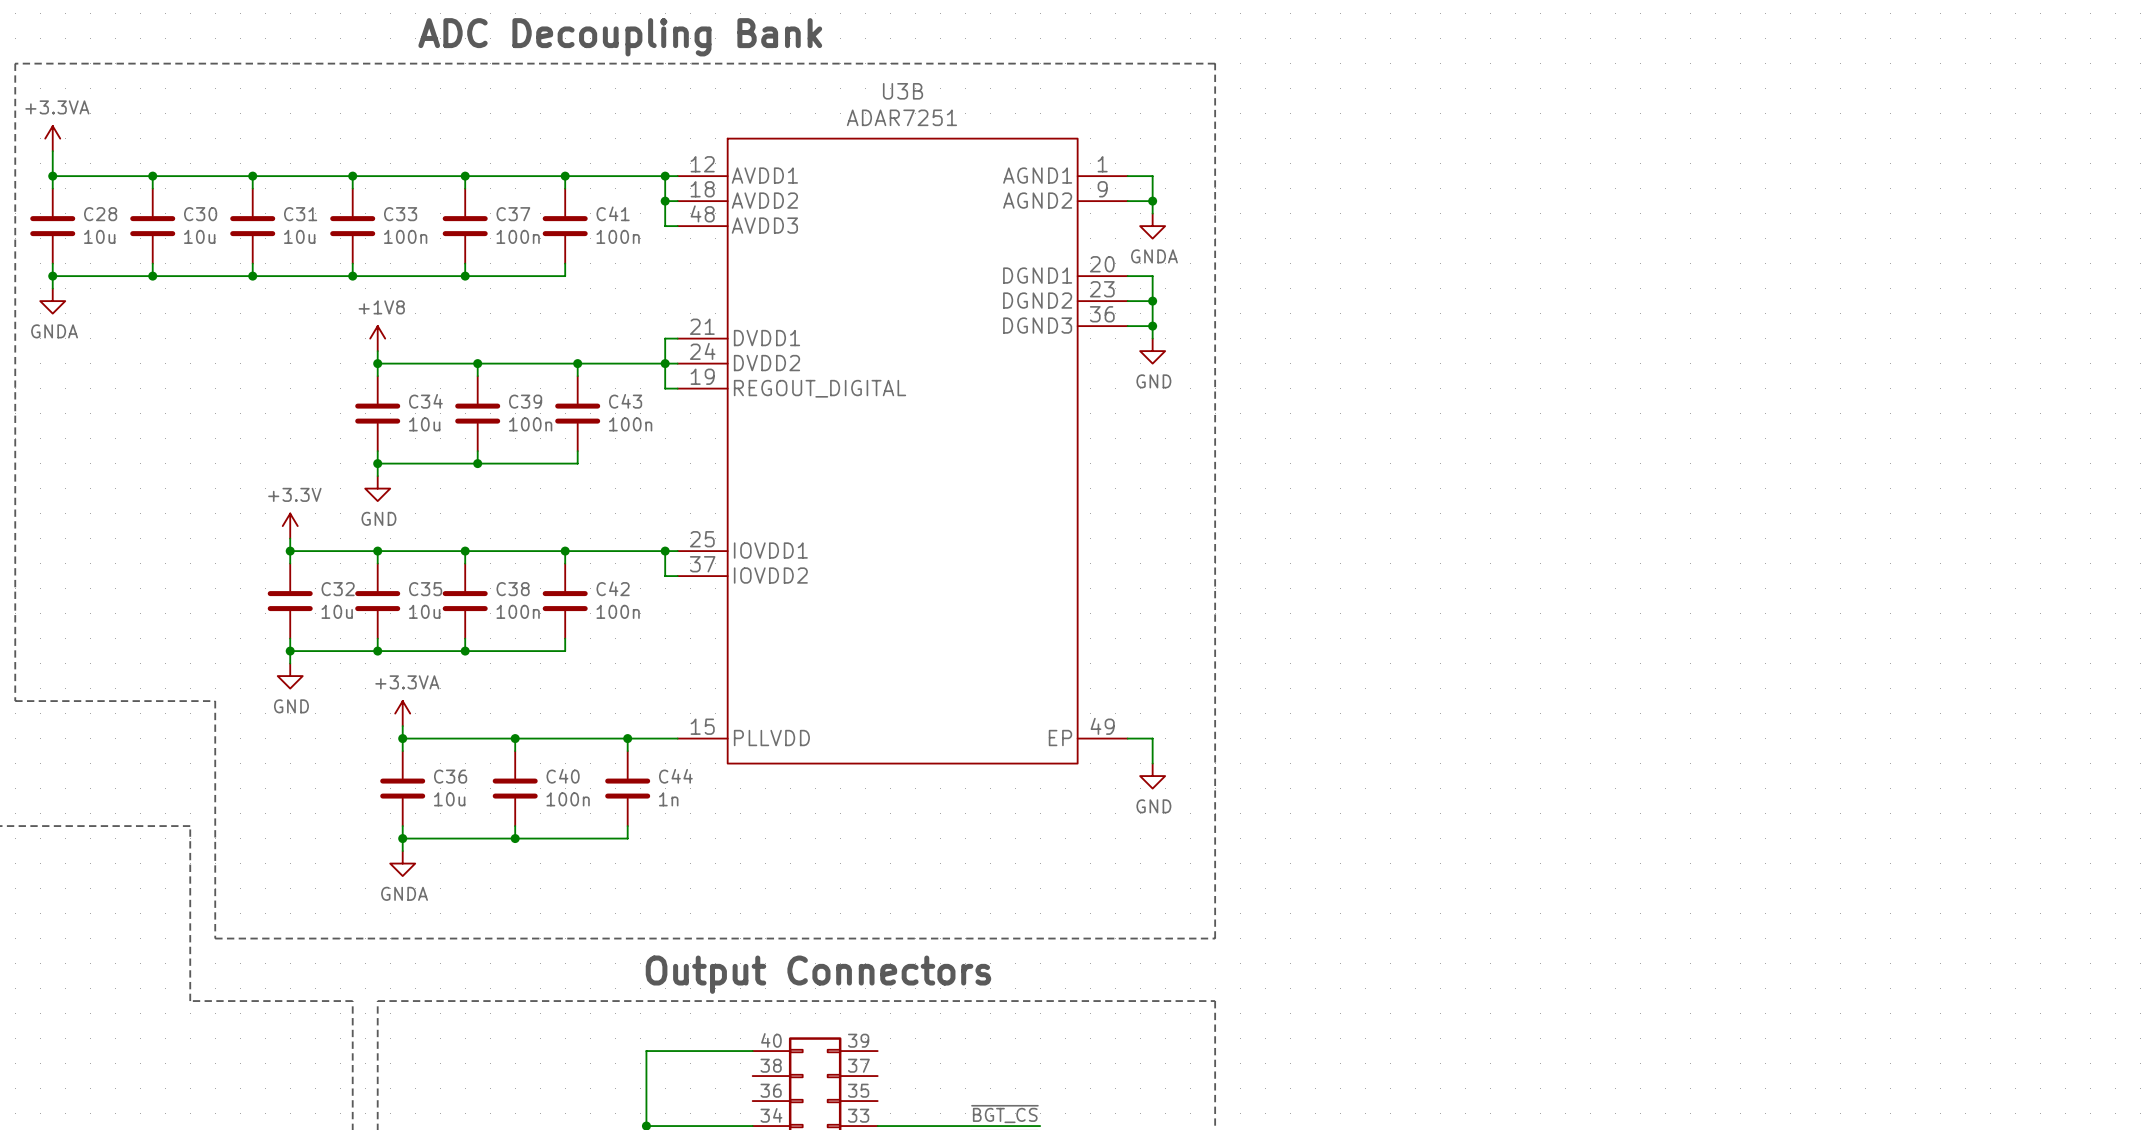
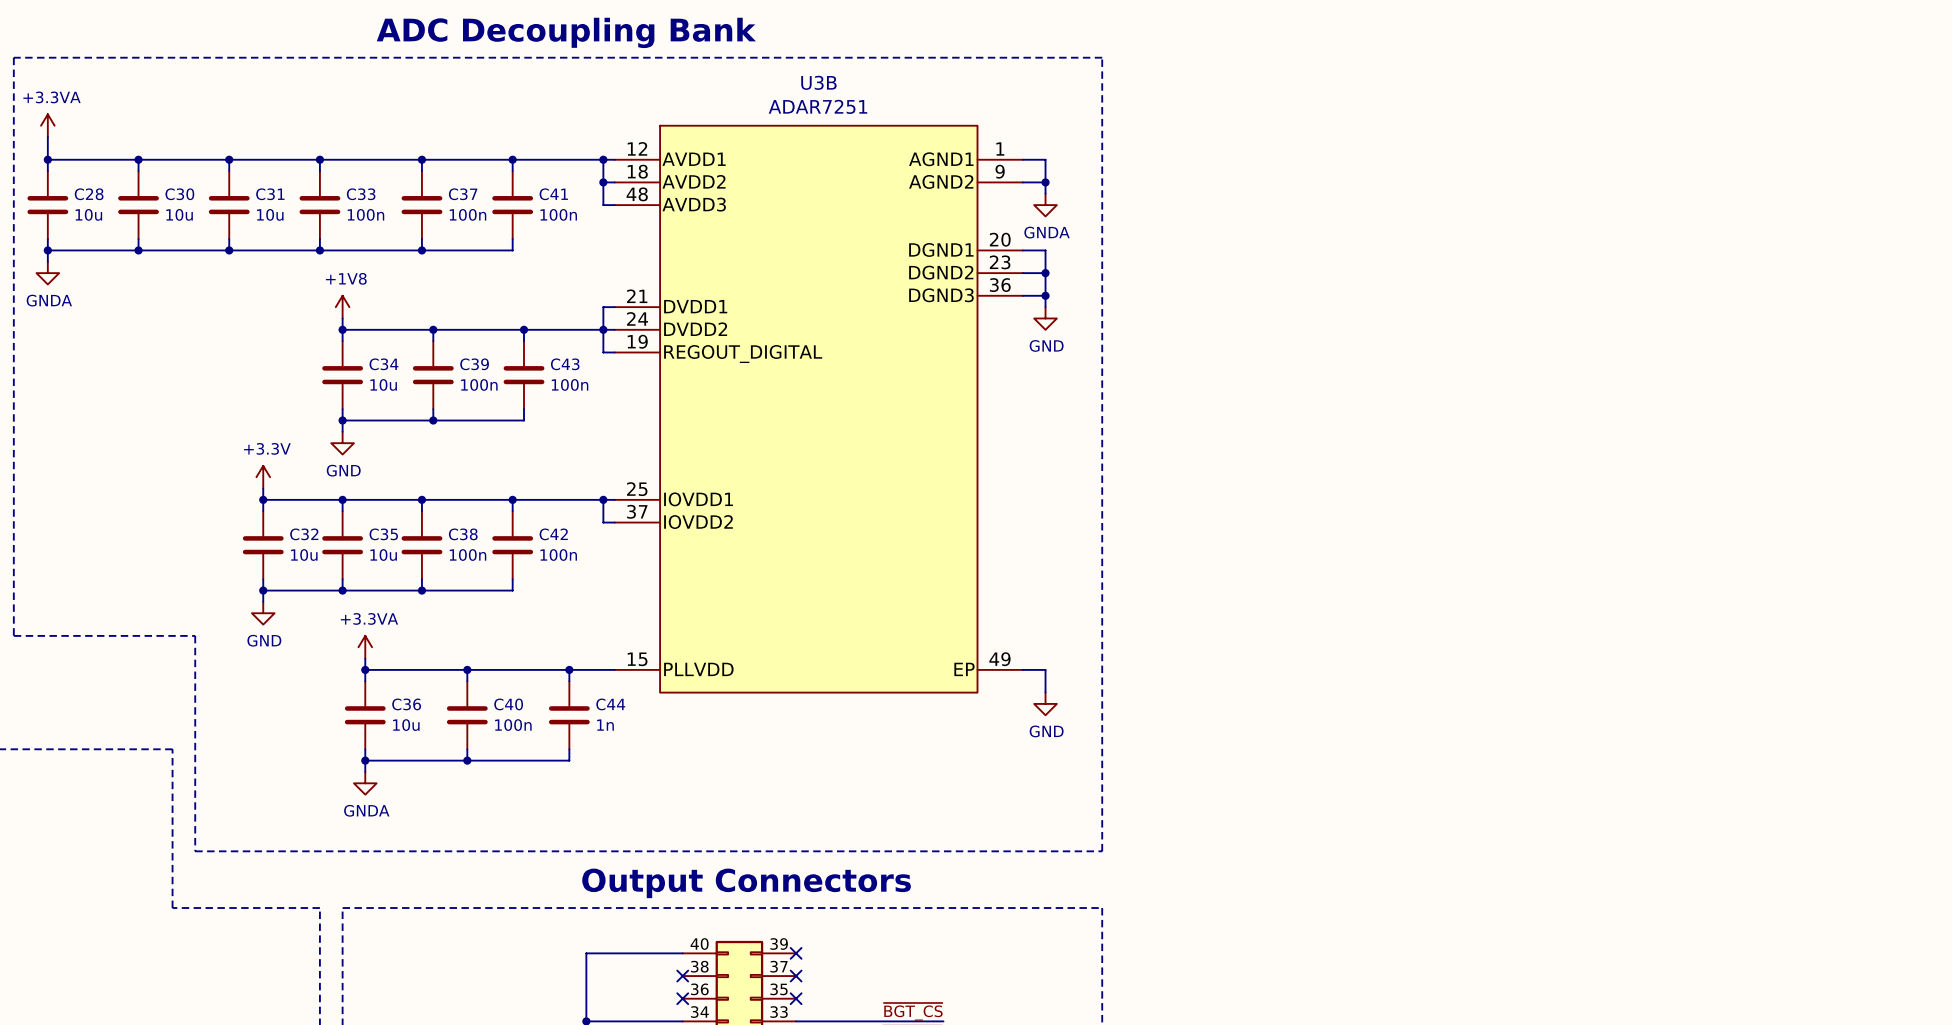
no-connect mark: none -> (796, 953)
no-connect mark: none -> (682, 976)
no-connect mark: none -> (796, 976)
no-connect mark: none -> (682, 998)
no-connect mark: none -> (796, 998)

